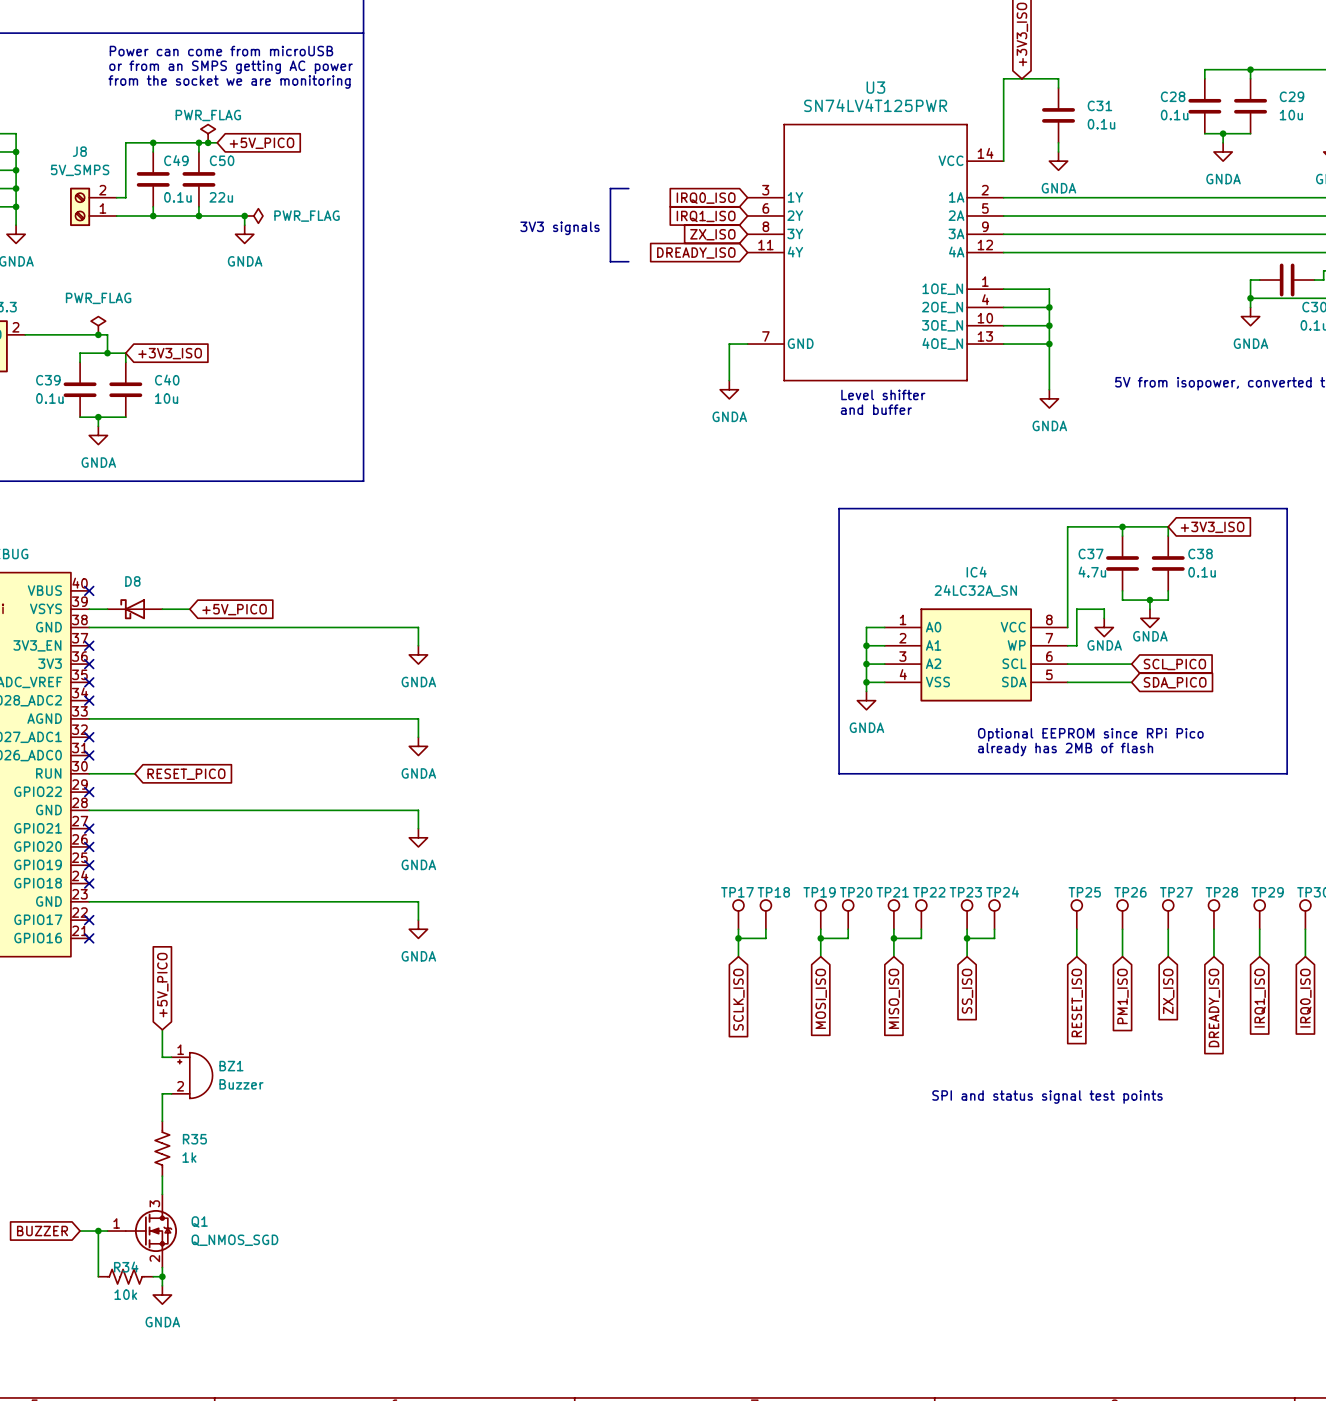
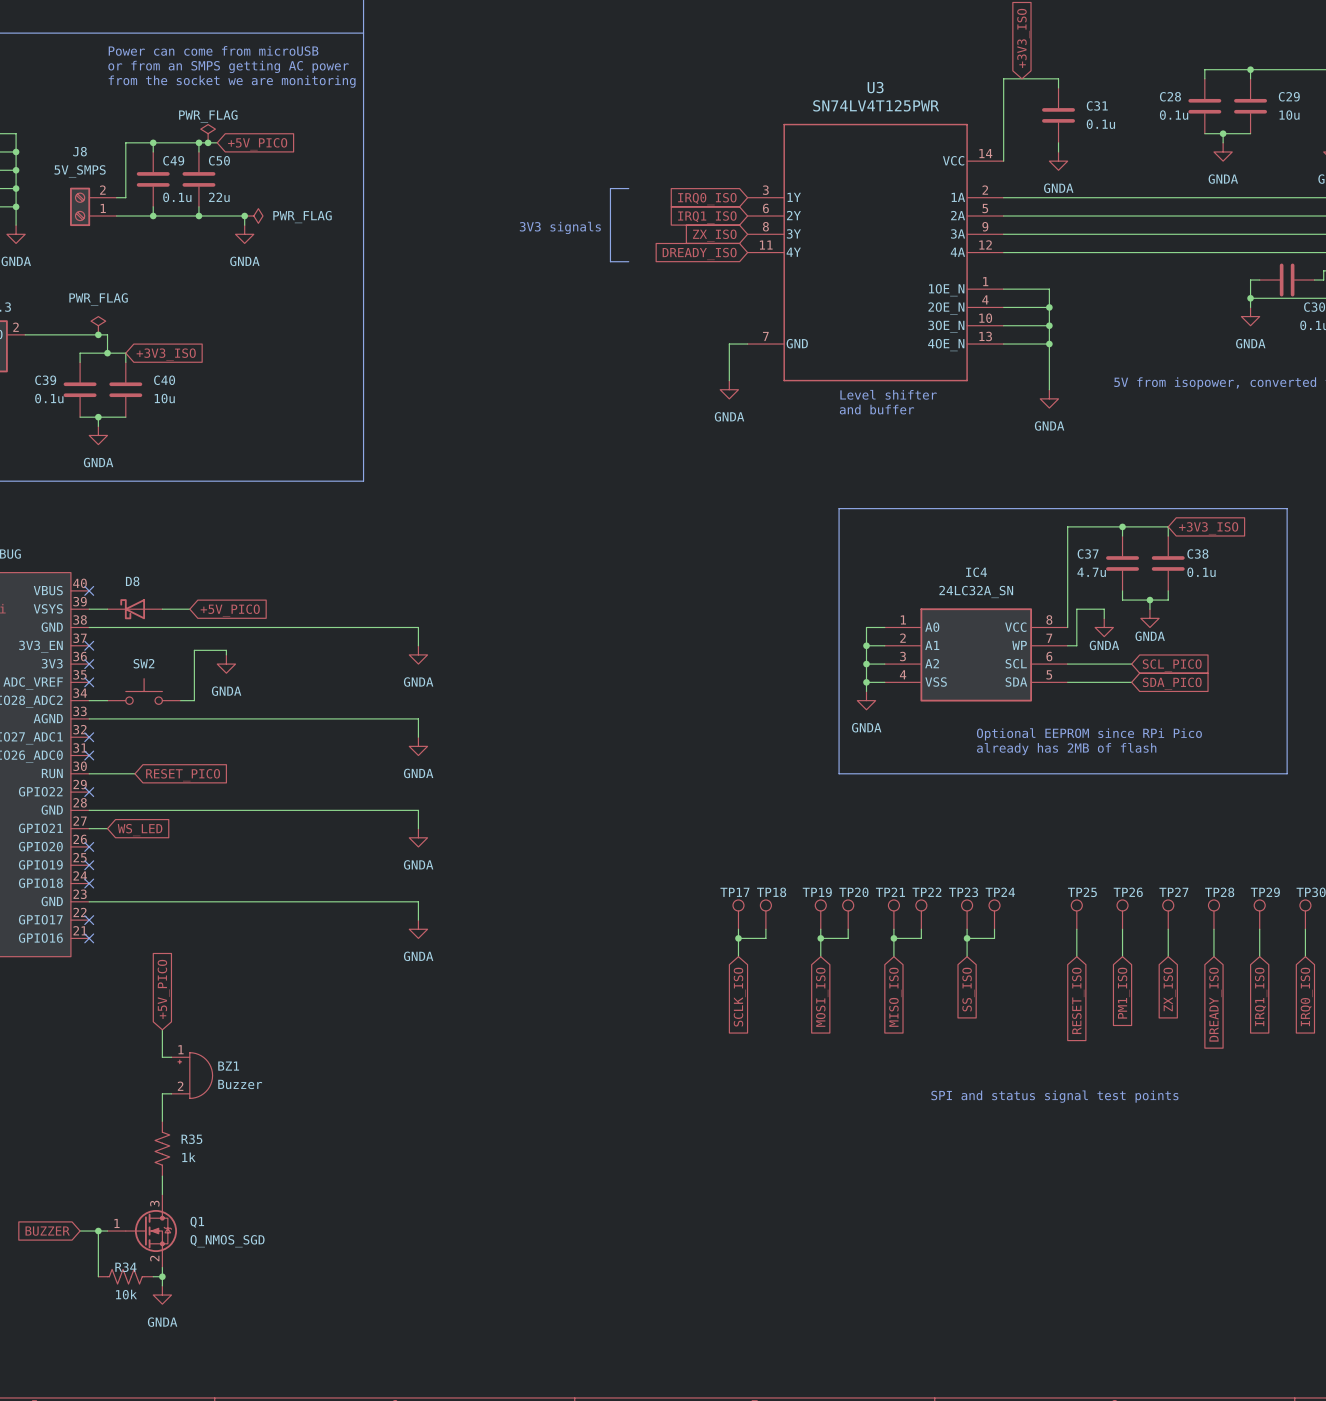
wire: none -> (226, 654) (226, 650) (194, 650) (194, 700) (180, 700)
power symbol: none -> GNDA (226, 664)
SW2: none -> (144, 691)
wire: none -> (89, 700) (107, 700)
no-connect mark: (89, 700) -> none
wire: none -> (89, 828) (107, 828)
no-connect mark: (89, 828) -> none
global label: none -> WS_LED (140, 830)

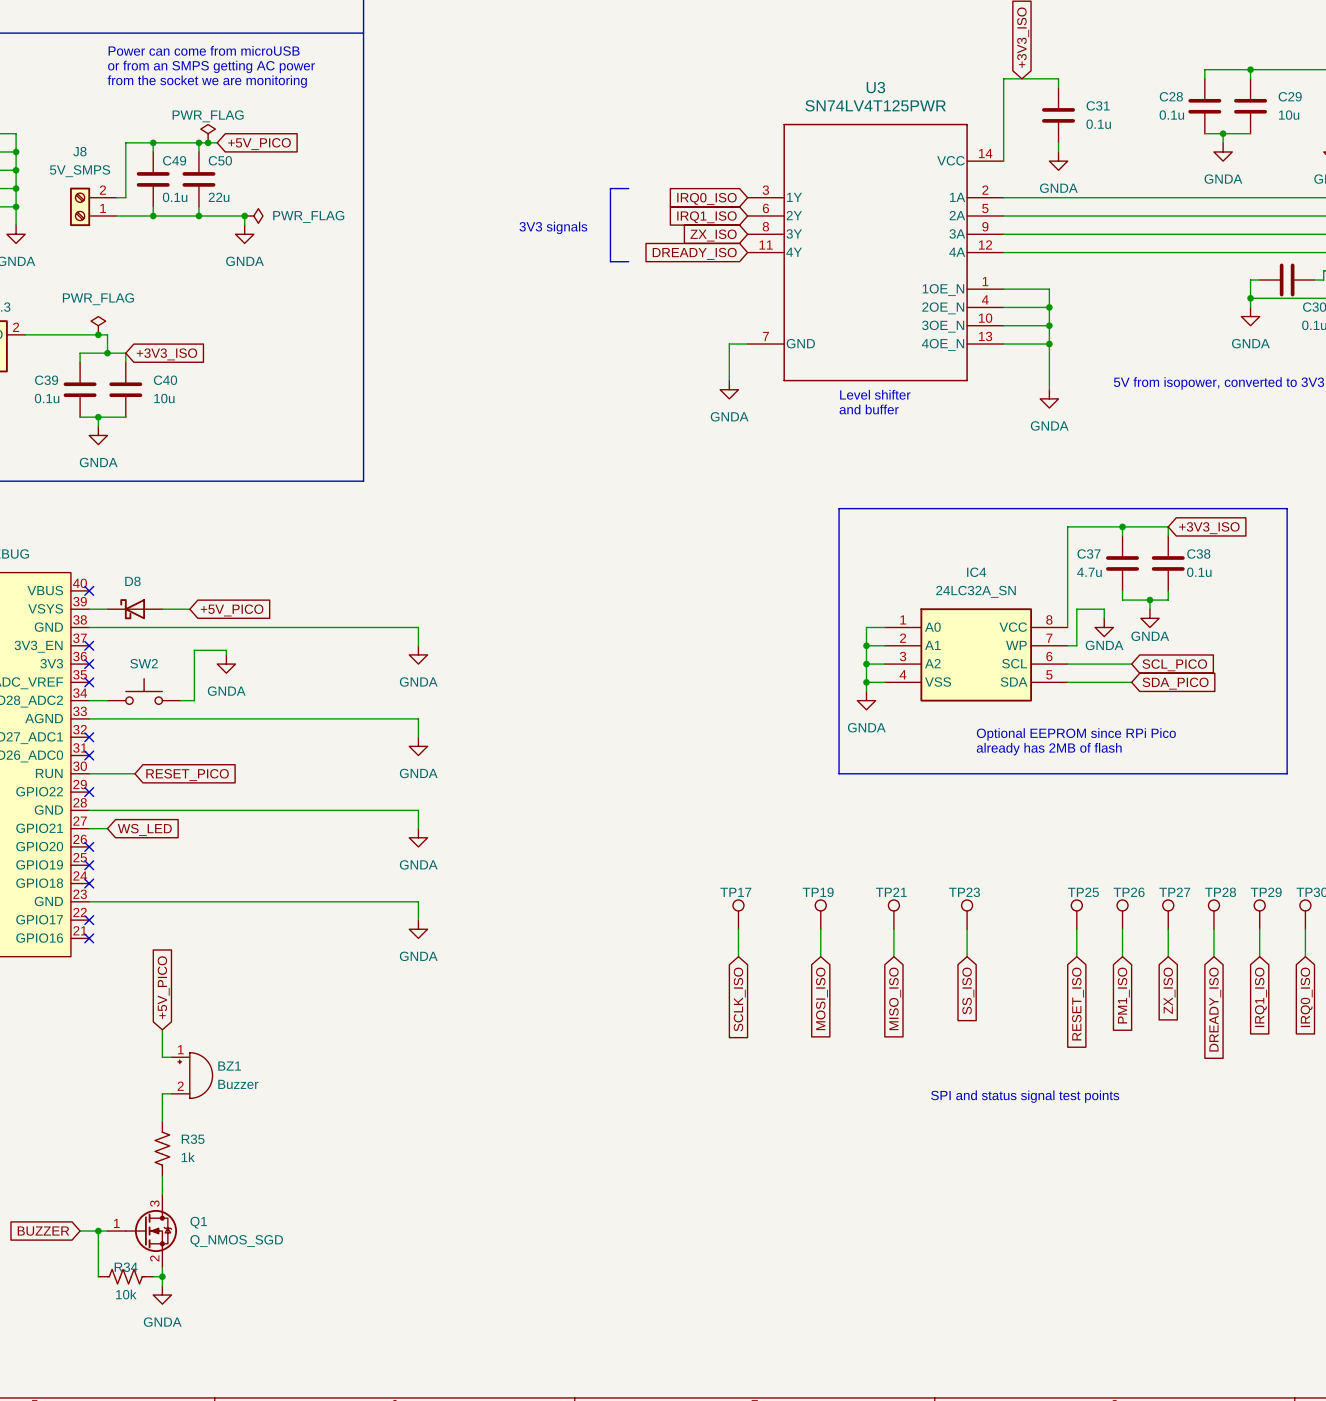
TP18: (765, 914) -> none
TP20: (848, 914) -> none
TP22: (921, 914) -> none
TP24: (994, 914) -> none
wire: (765, 929) (765, 938) (738, 938) -> none
wire: (848, 929) (848, 938) (820, 938) -> none
wire: (921, 929) (921, 938) (893, 938) -> none
wire: (994, 929) (994, 938) (967, 938) -> none
junction: (738, 938) -> none
junction: (820, 938) -> none
junction: (893, 938) -> none
junction: (967, 938) -> none

